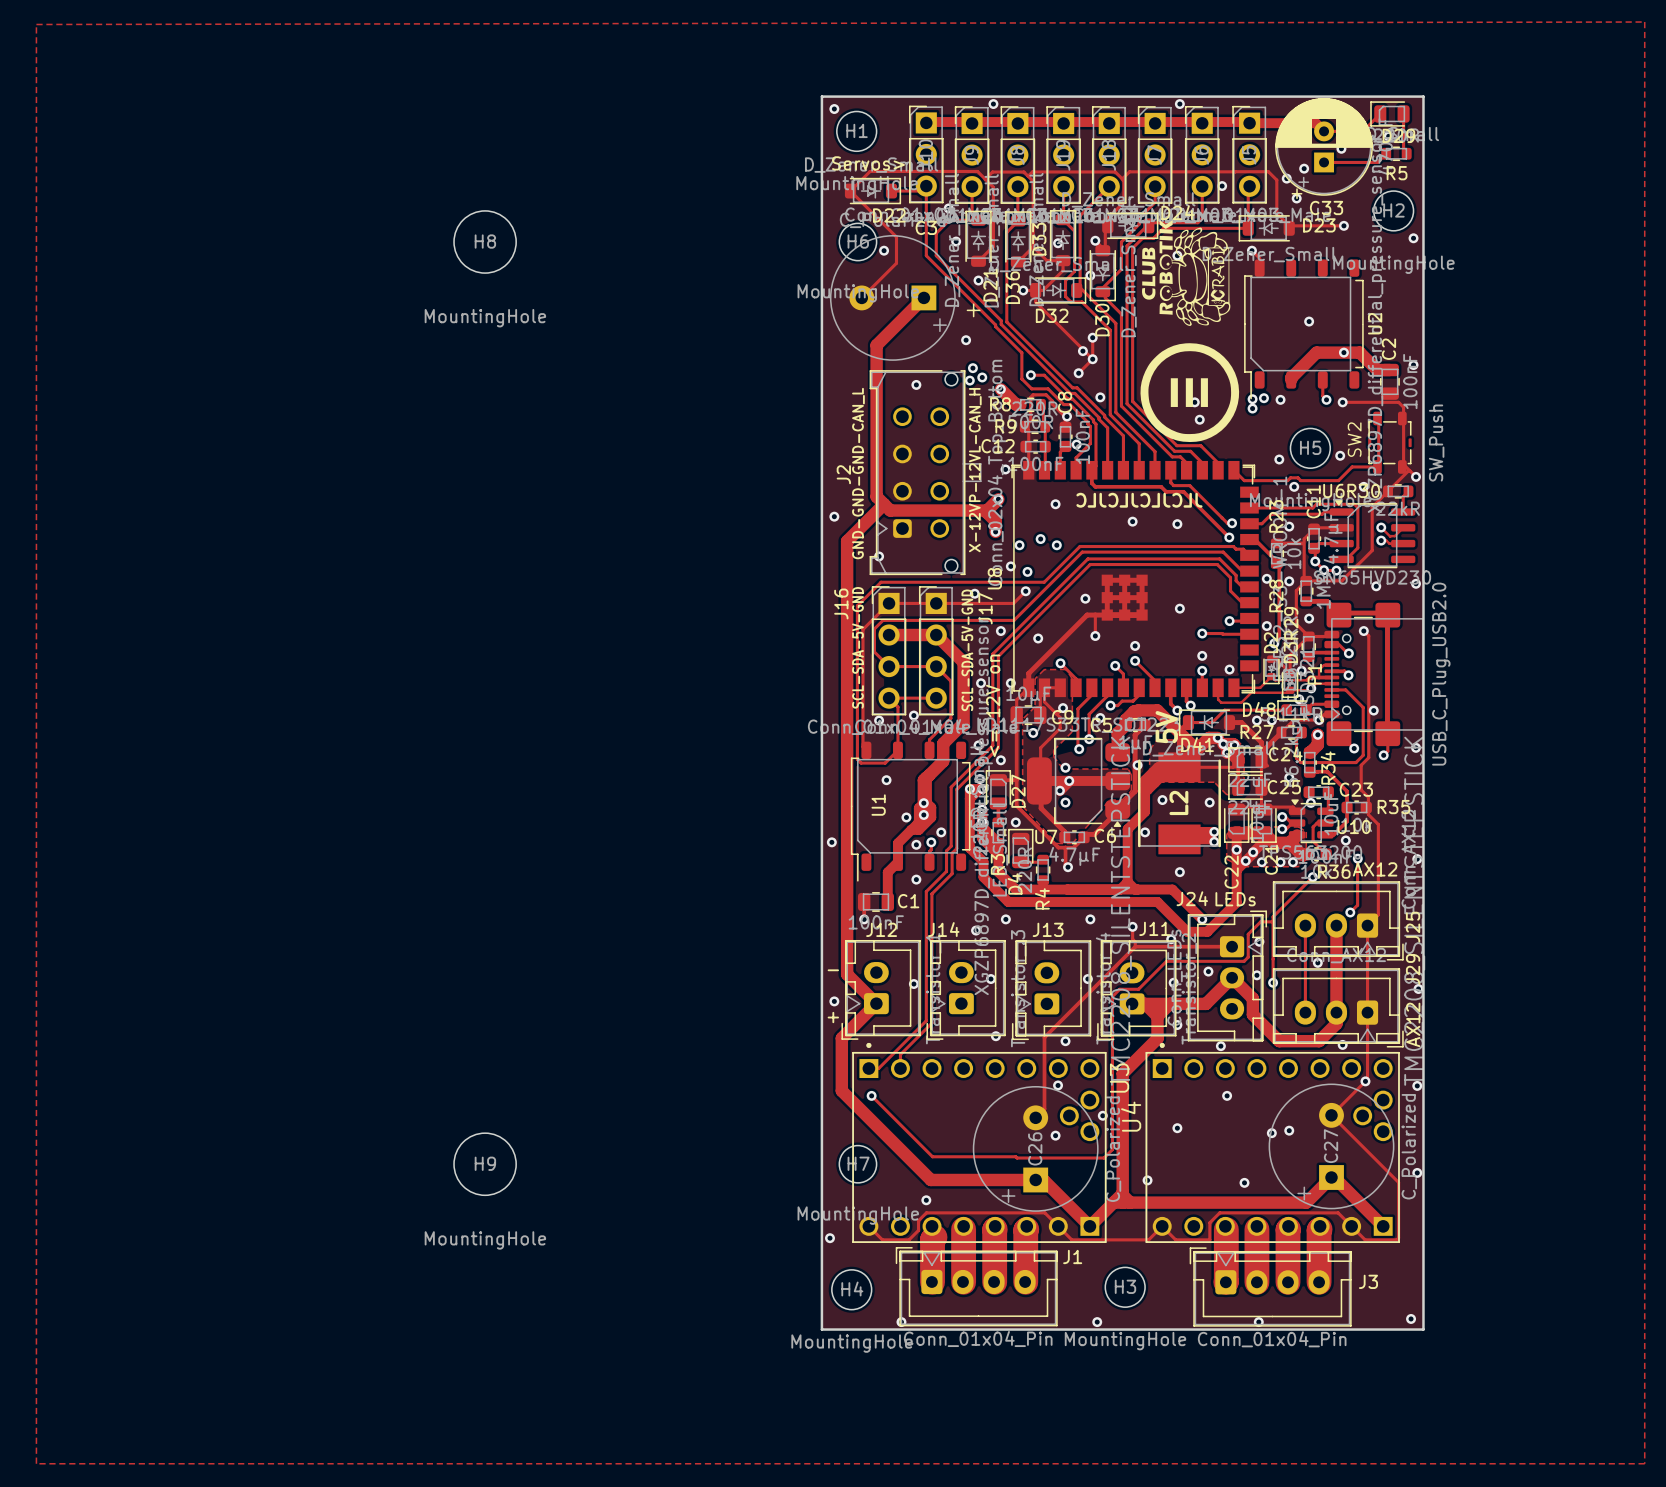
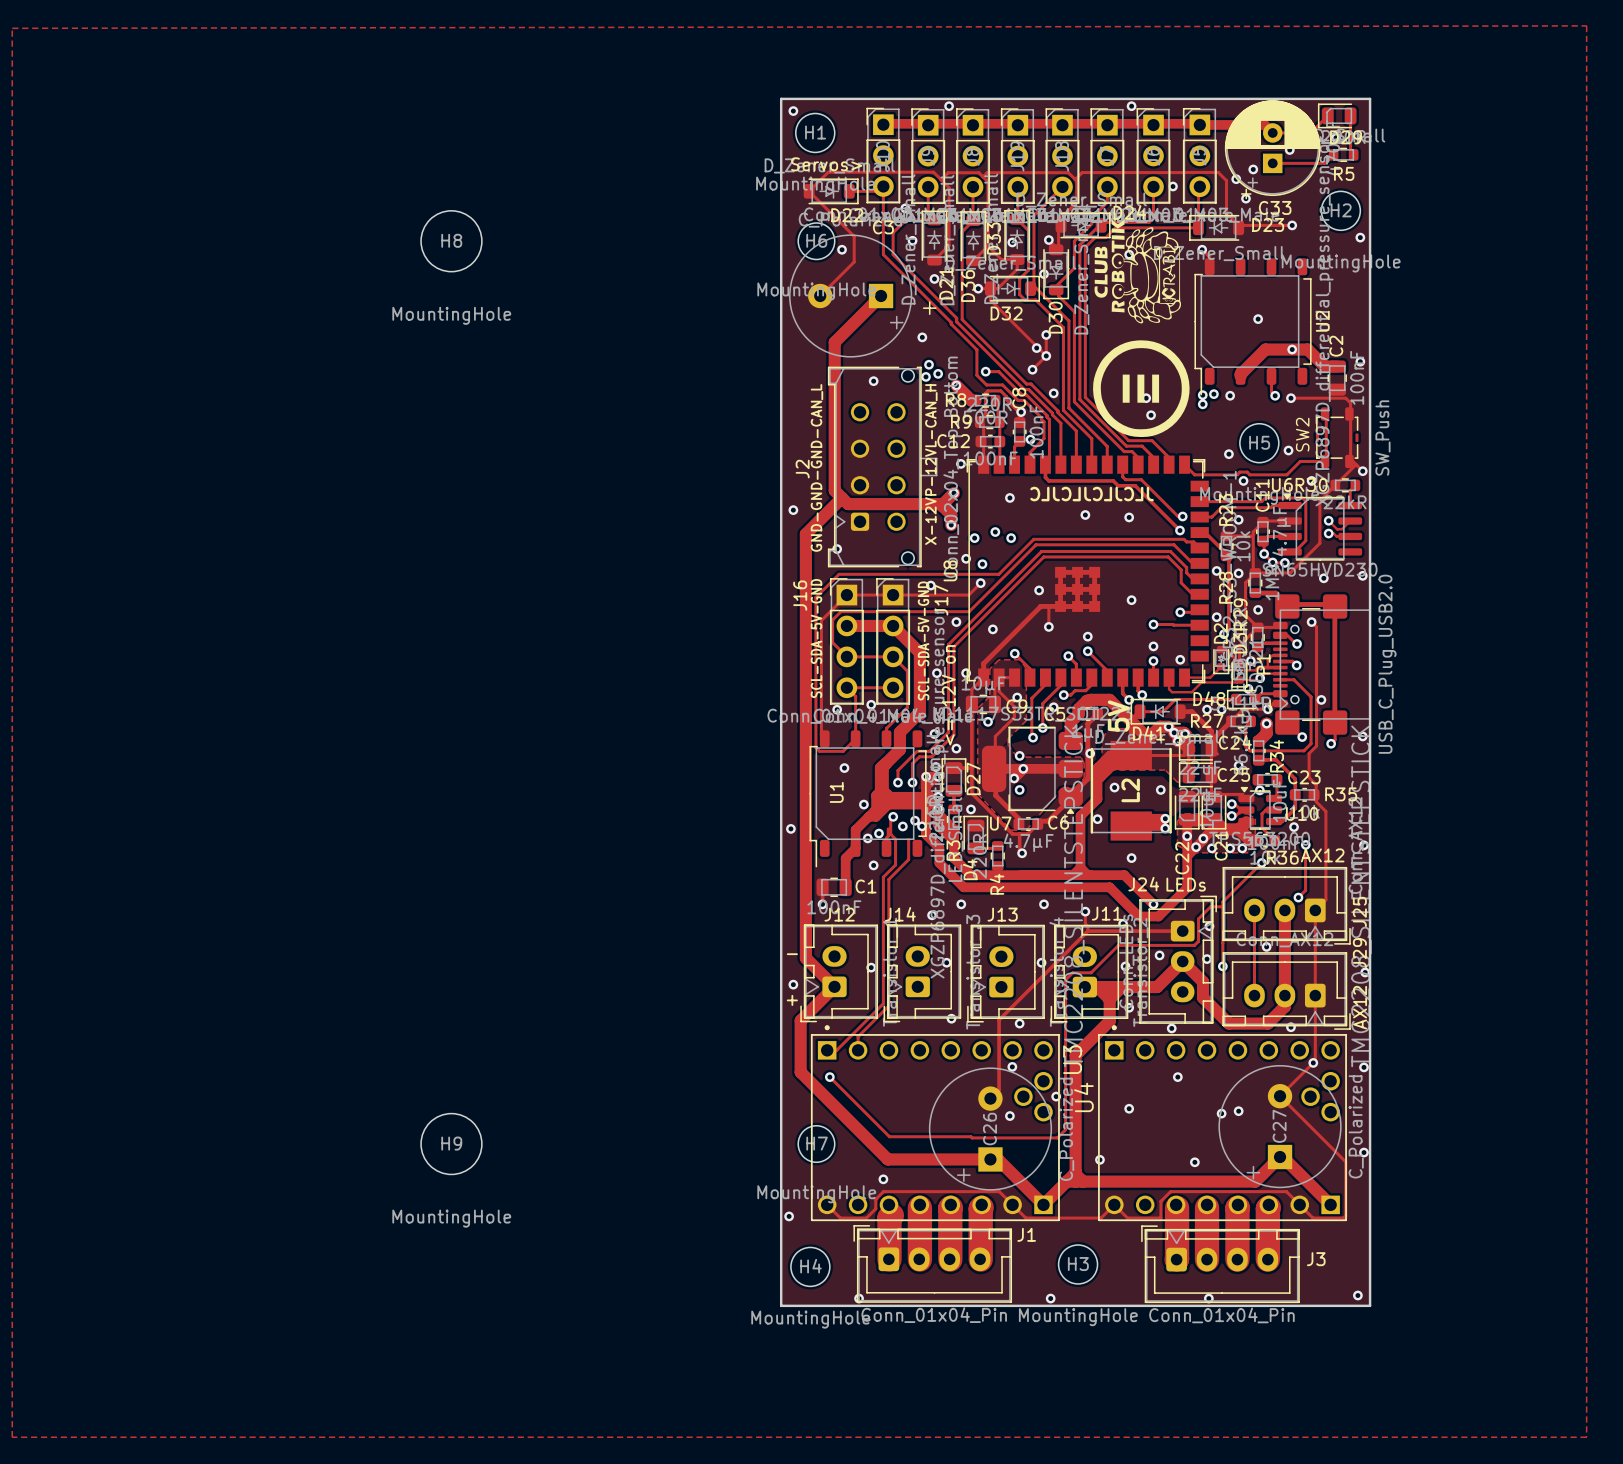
track: (992, 743) (951, 787) (951, 846) (946, 850) (946, 871) (938, 879) -> (948, 732) (929, 751) (917, 751) (897, 770) (897, 782)
track: (998, 746) (956, 789) (956, 848) (952, 853) -> (953, 734) (931, 756) (919, 756) (912, 763) (912, 782)
via: none -> (897, 782)
via: none -> (912, 782)
via: (923, 803) -> none
track: none -> (888, 794) (890, 796) (930, 796) (938, 804) (888, 804)
via: (923, 814) -> none
track: none -> (893, 816) (890, 819) (890, 834) (895, 839) (895, 864)
via: none -> (893, 816)
via: (941, 832) -> none
via: none -> (915, 820)
via: none -> (902, 826)
via: none -> (922, 826)
via: (931, 842) -> none
via: (916, 844) -> none
via: none -> (878, 833)
via: none -> (867, 838)

